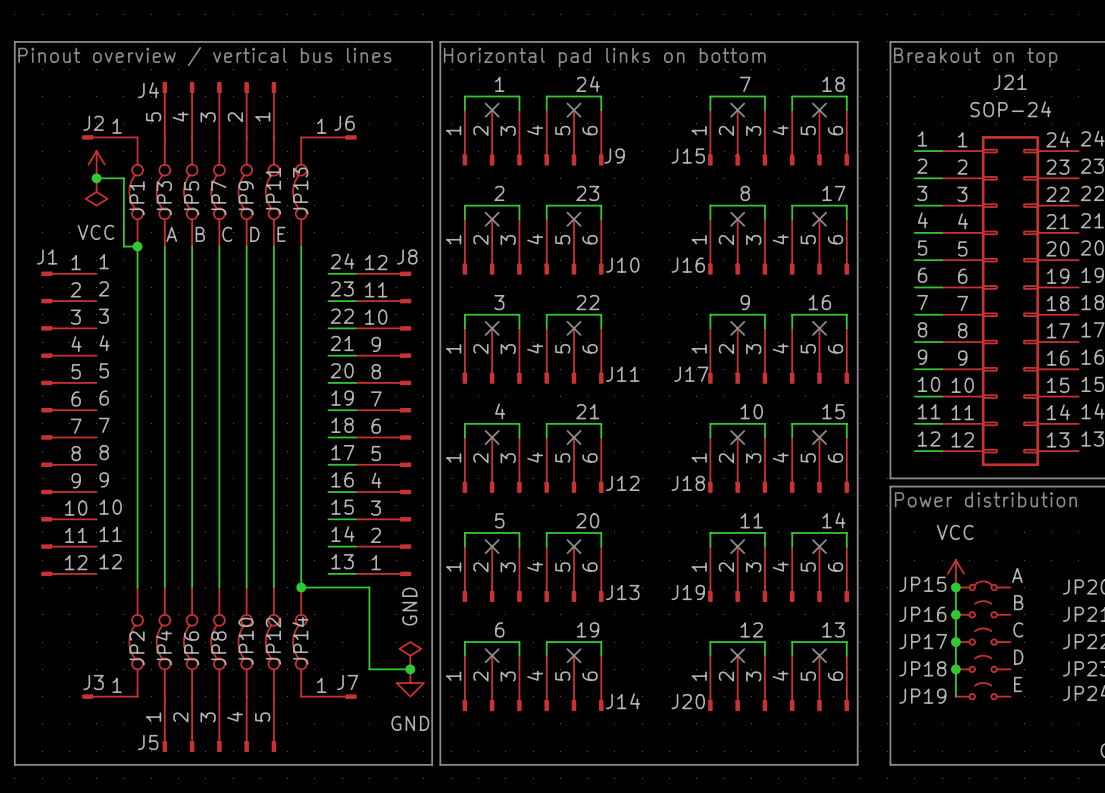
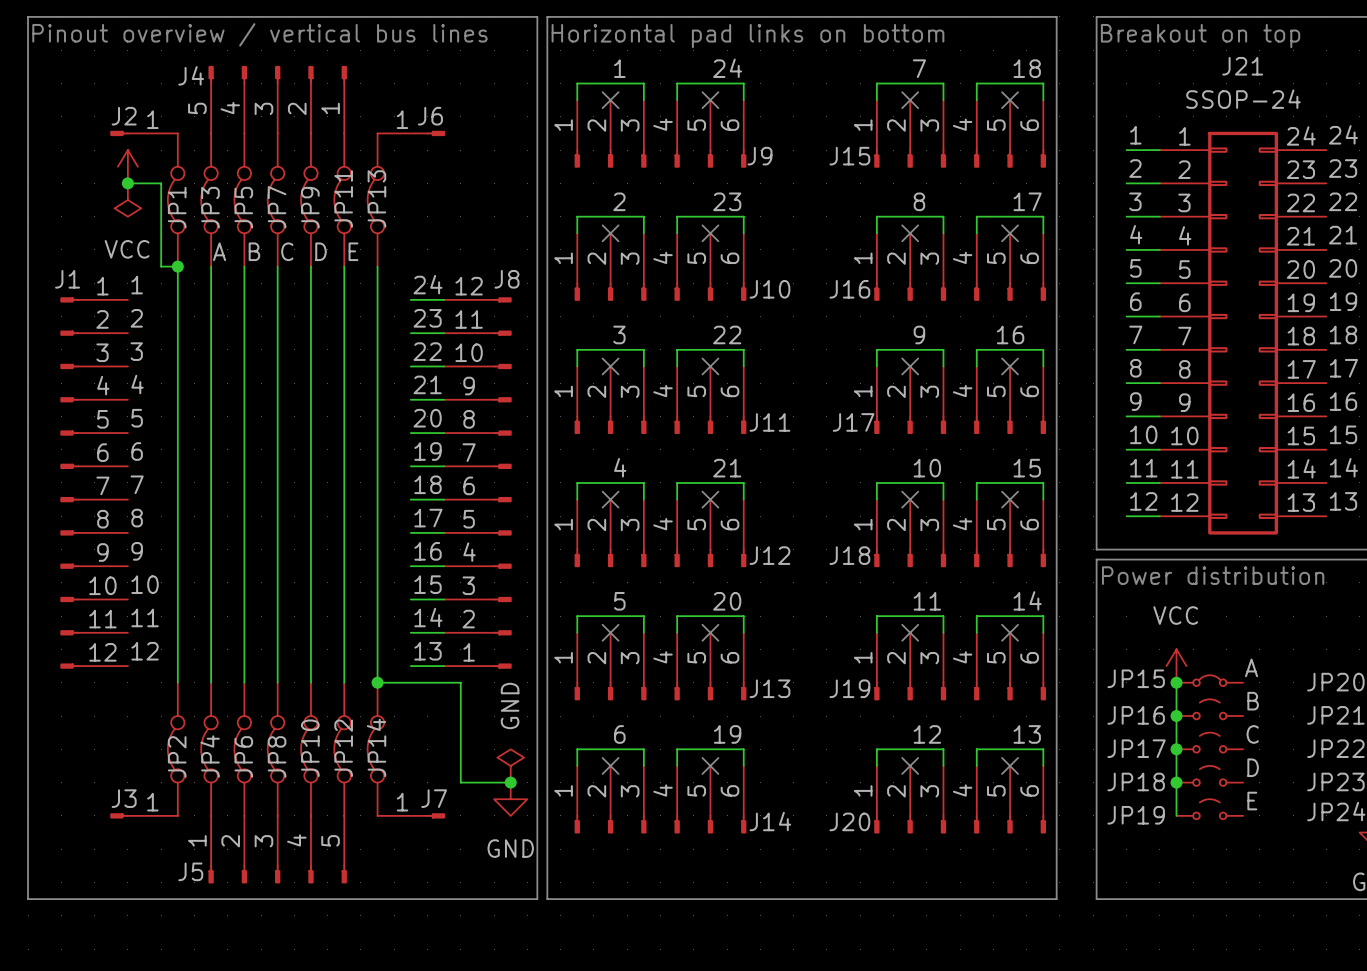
J21 value: SOP-24 (1010, 109) -> SSOP-24 (1243, 99)

